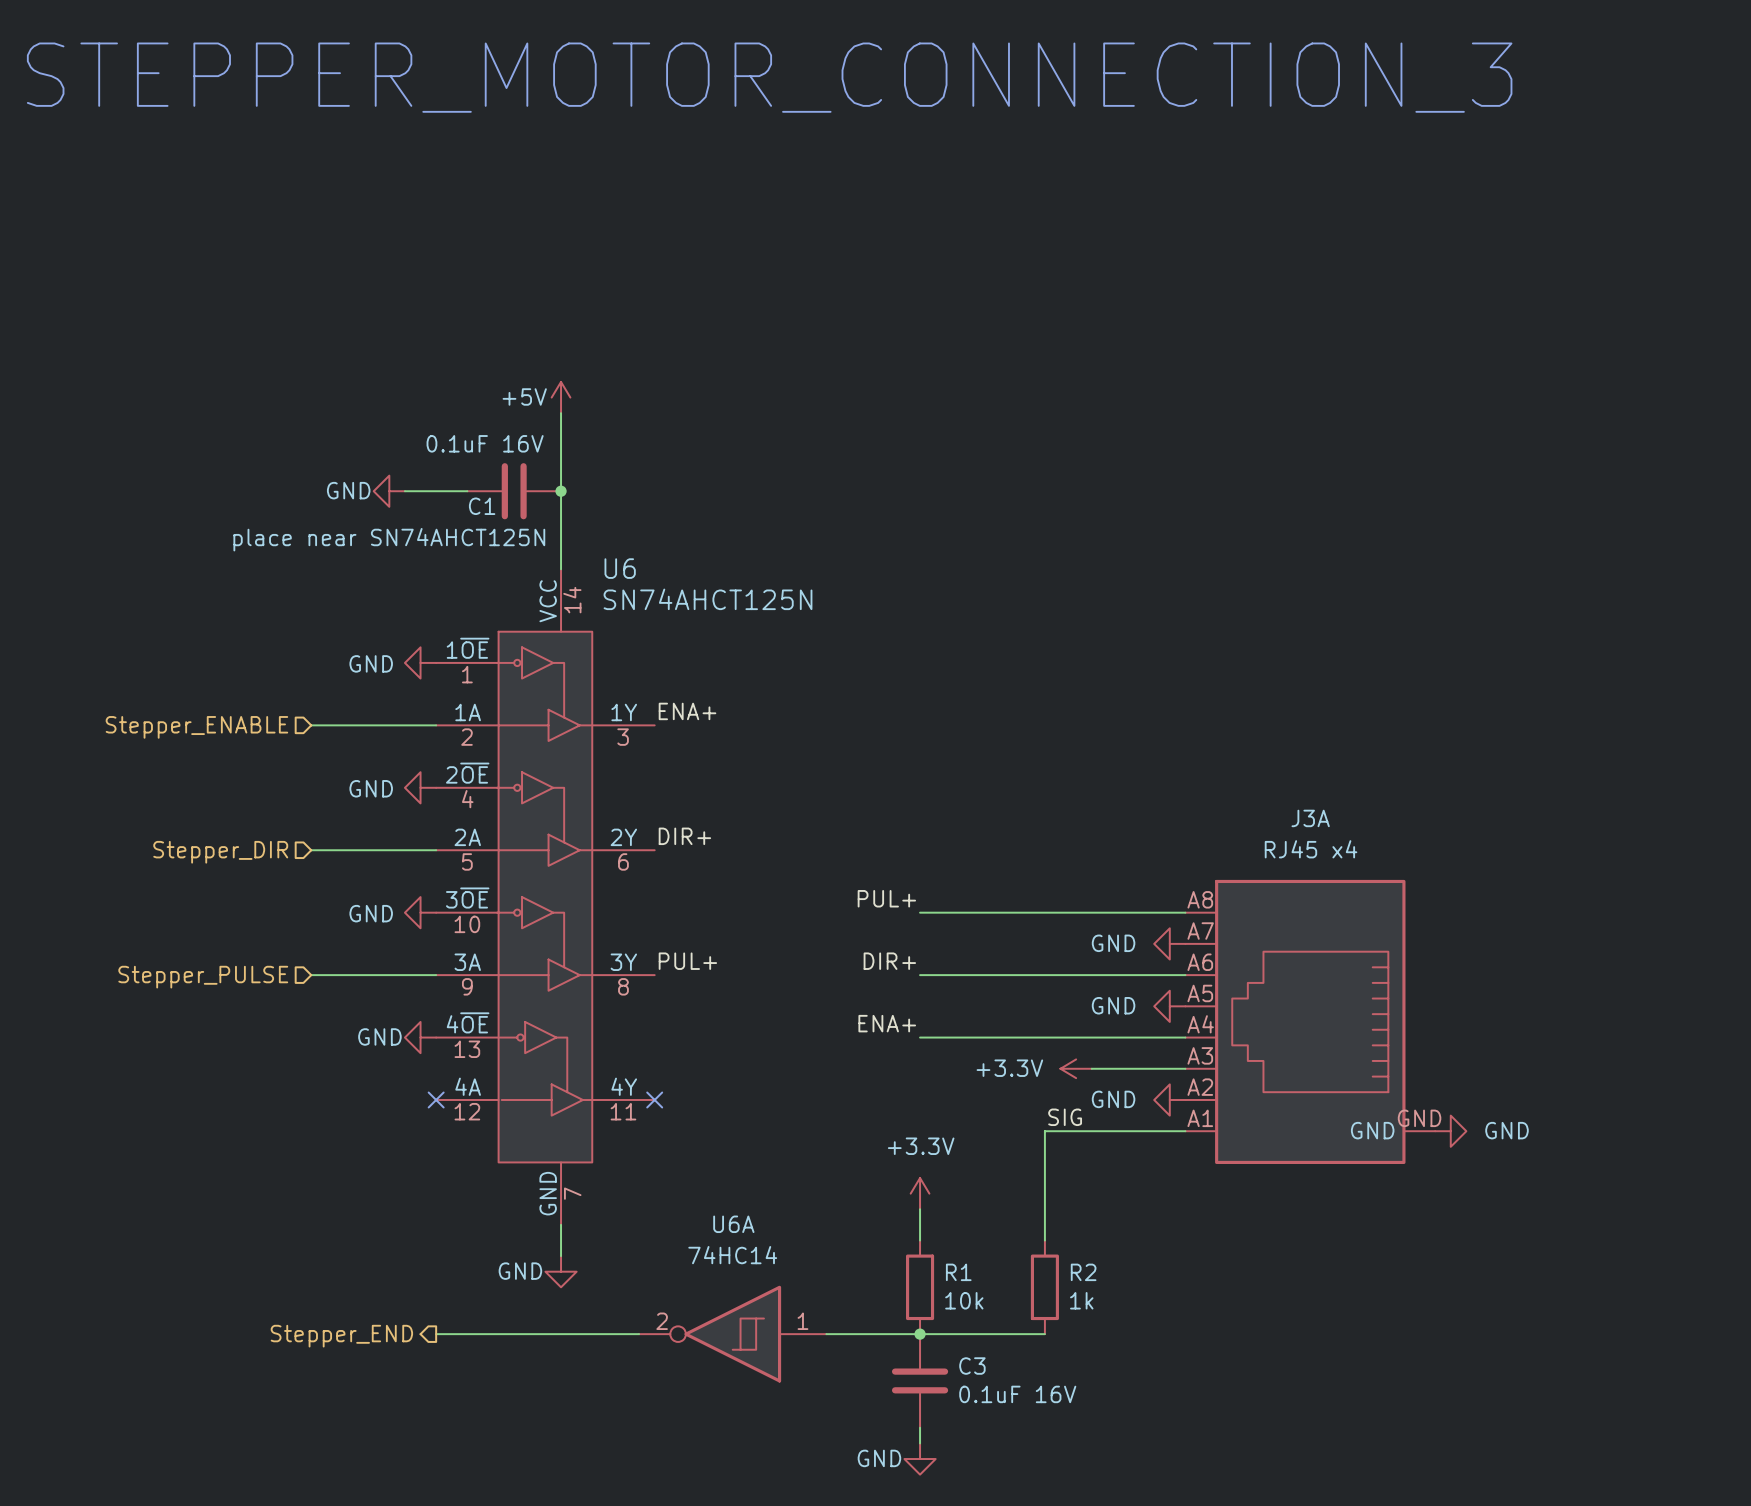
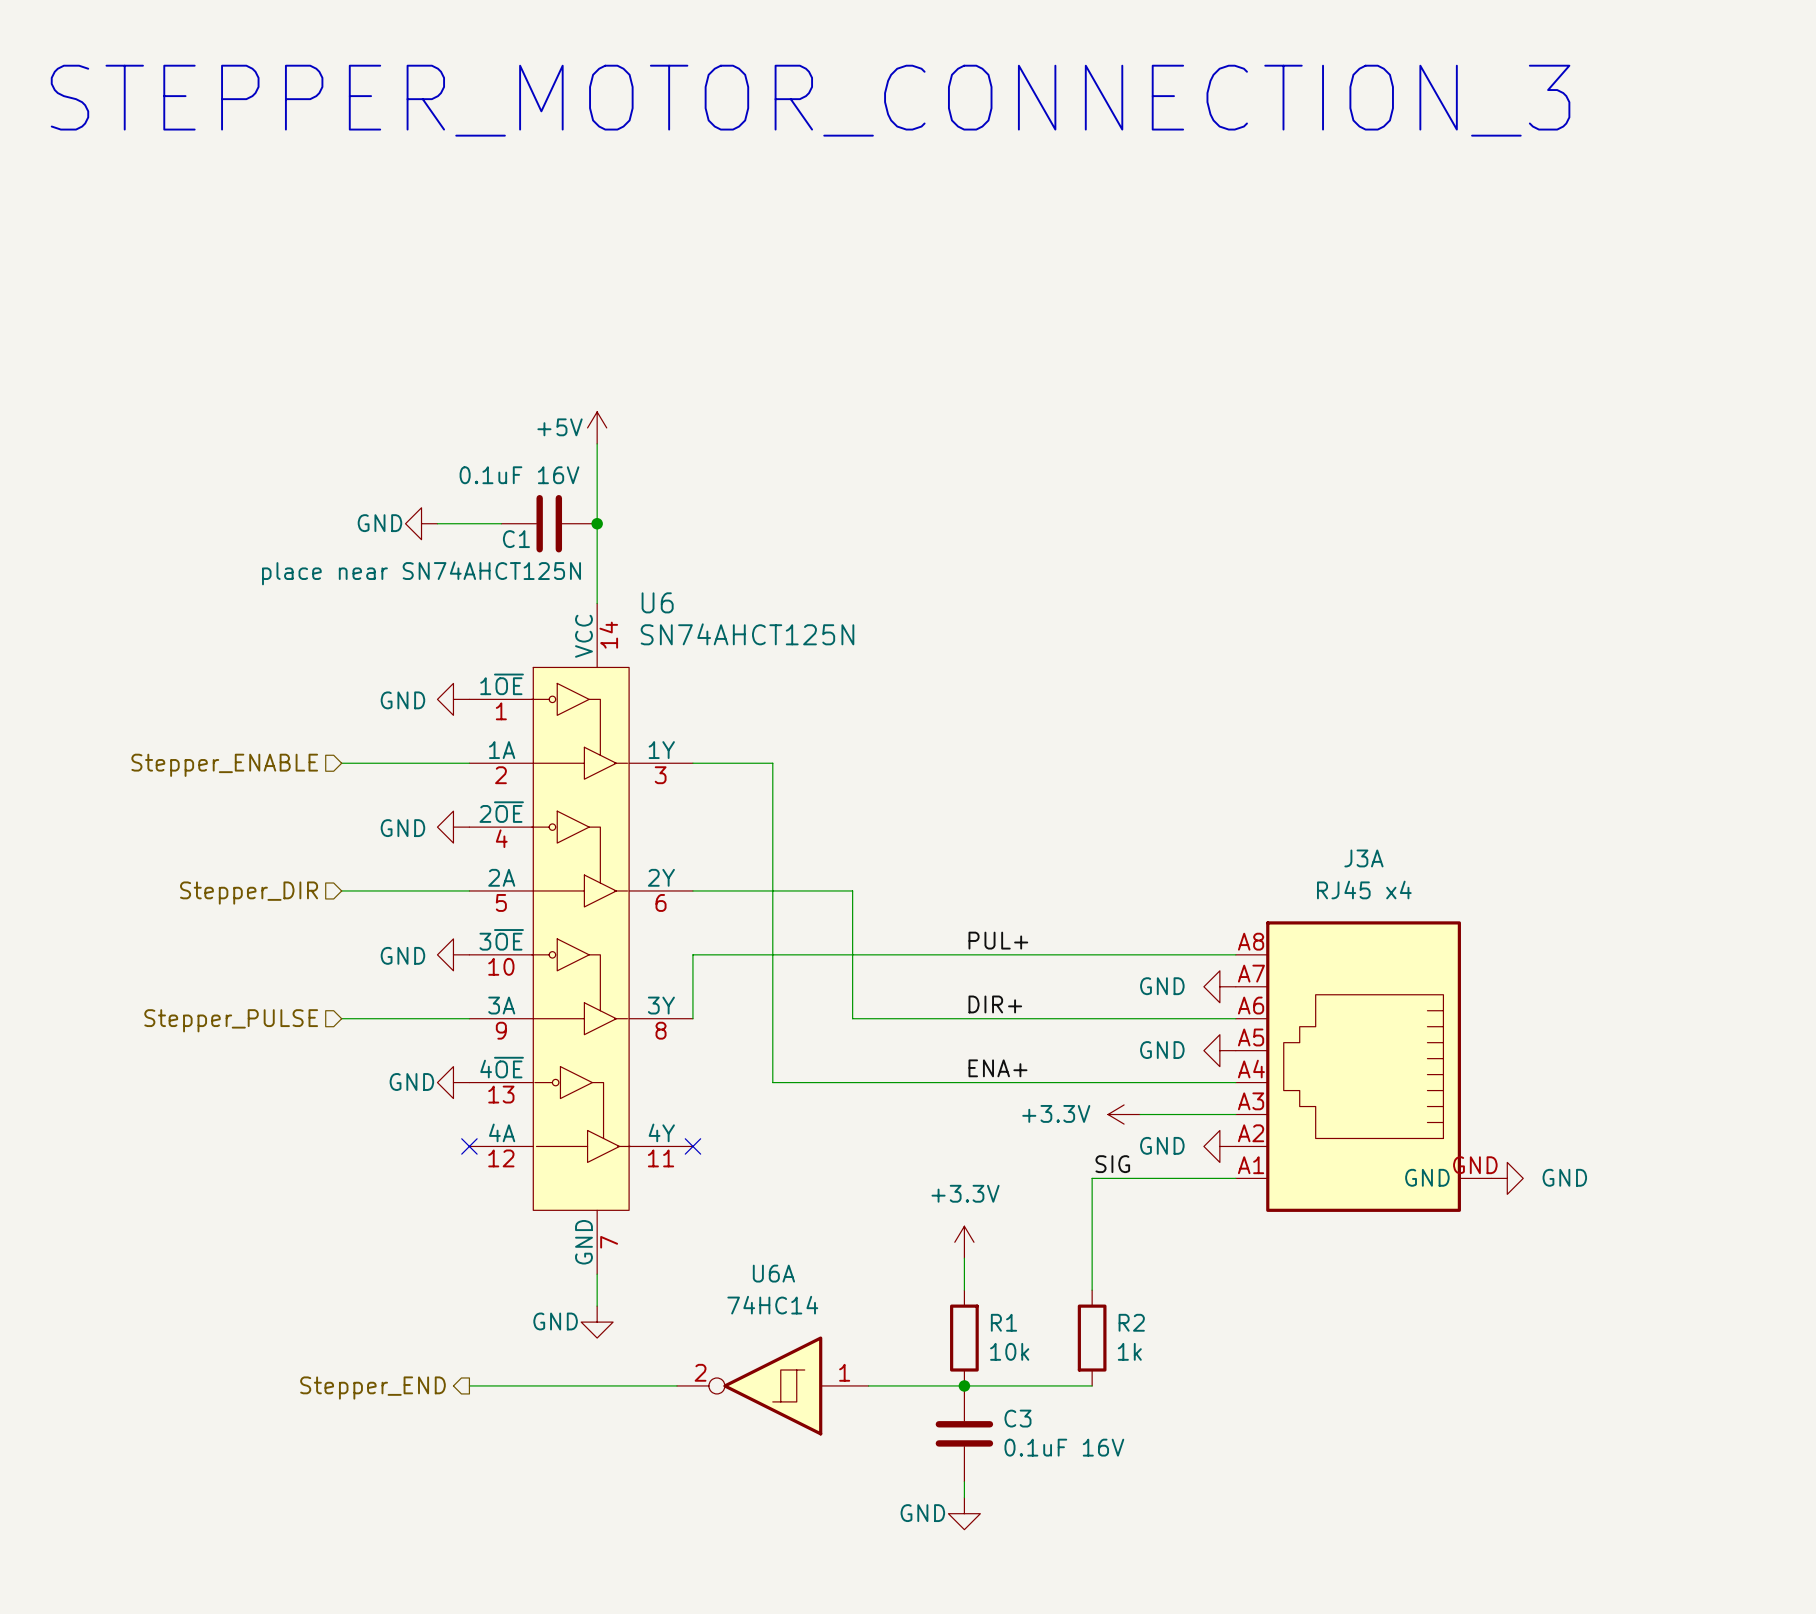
label: ENA+ (687, 711) -> none
wire: none -> (692, 763) (772, 763) (772, 1082) (964, 1082)
label: DIR+ (684, 836) -> none
wire: none -> (692, 890) (852, 890) (852, 1018) (964, 1018)
label position: PUL+ (886, 898) -> PUL+ (998, 940)
wire: none -> (964, 954) (692, 954) (692, 1018)
label: PUL+ (687, 961) -> none
label position: DIR+ (889, 961) -> DIR+ (995, 1004)
label position: ENA+ (887, 1023) -> ENA+ (997, 1068)

